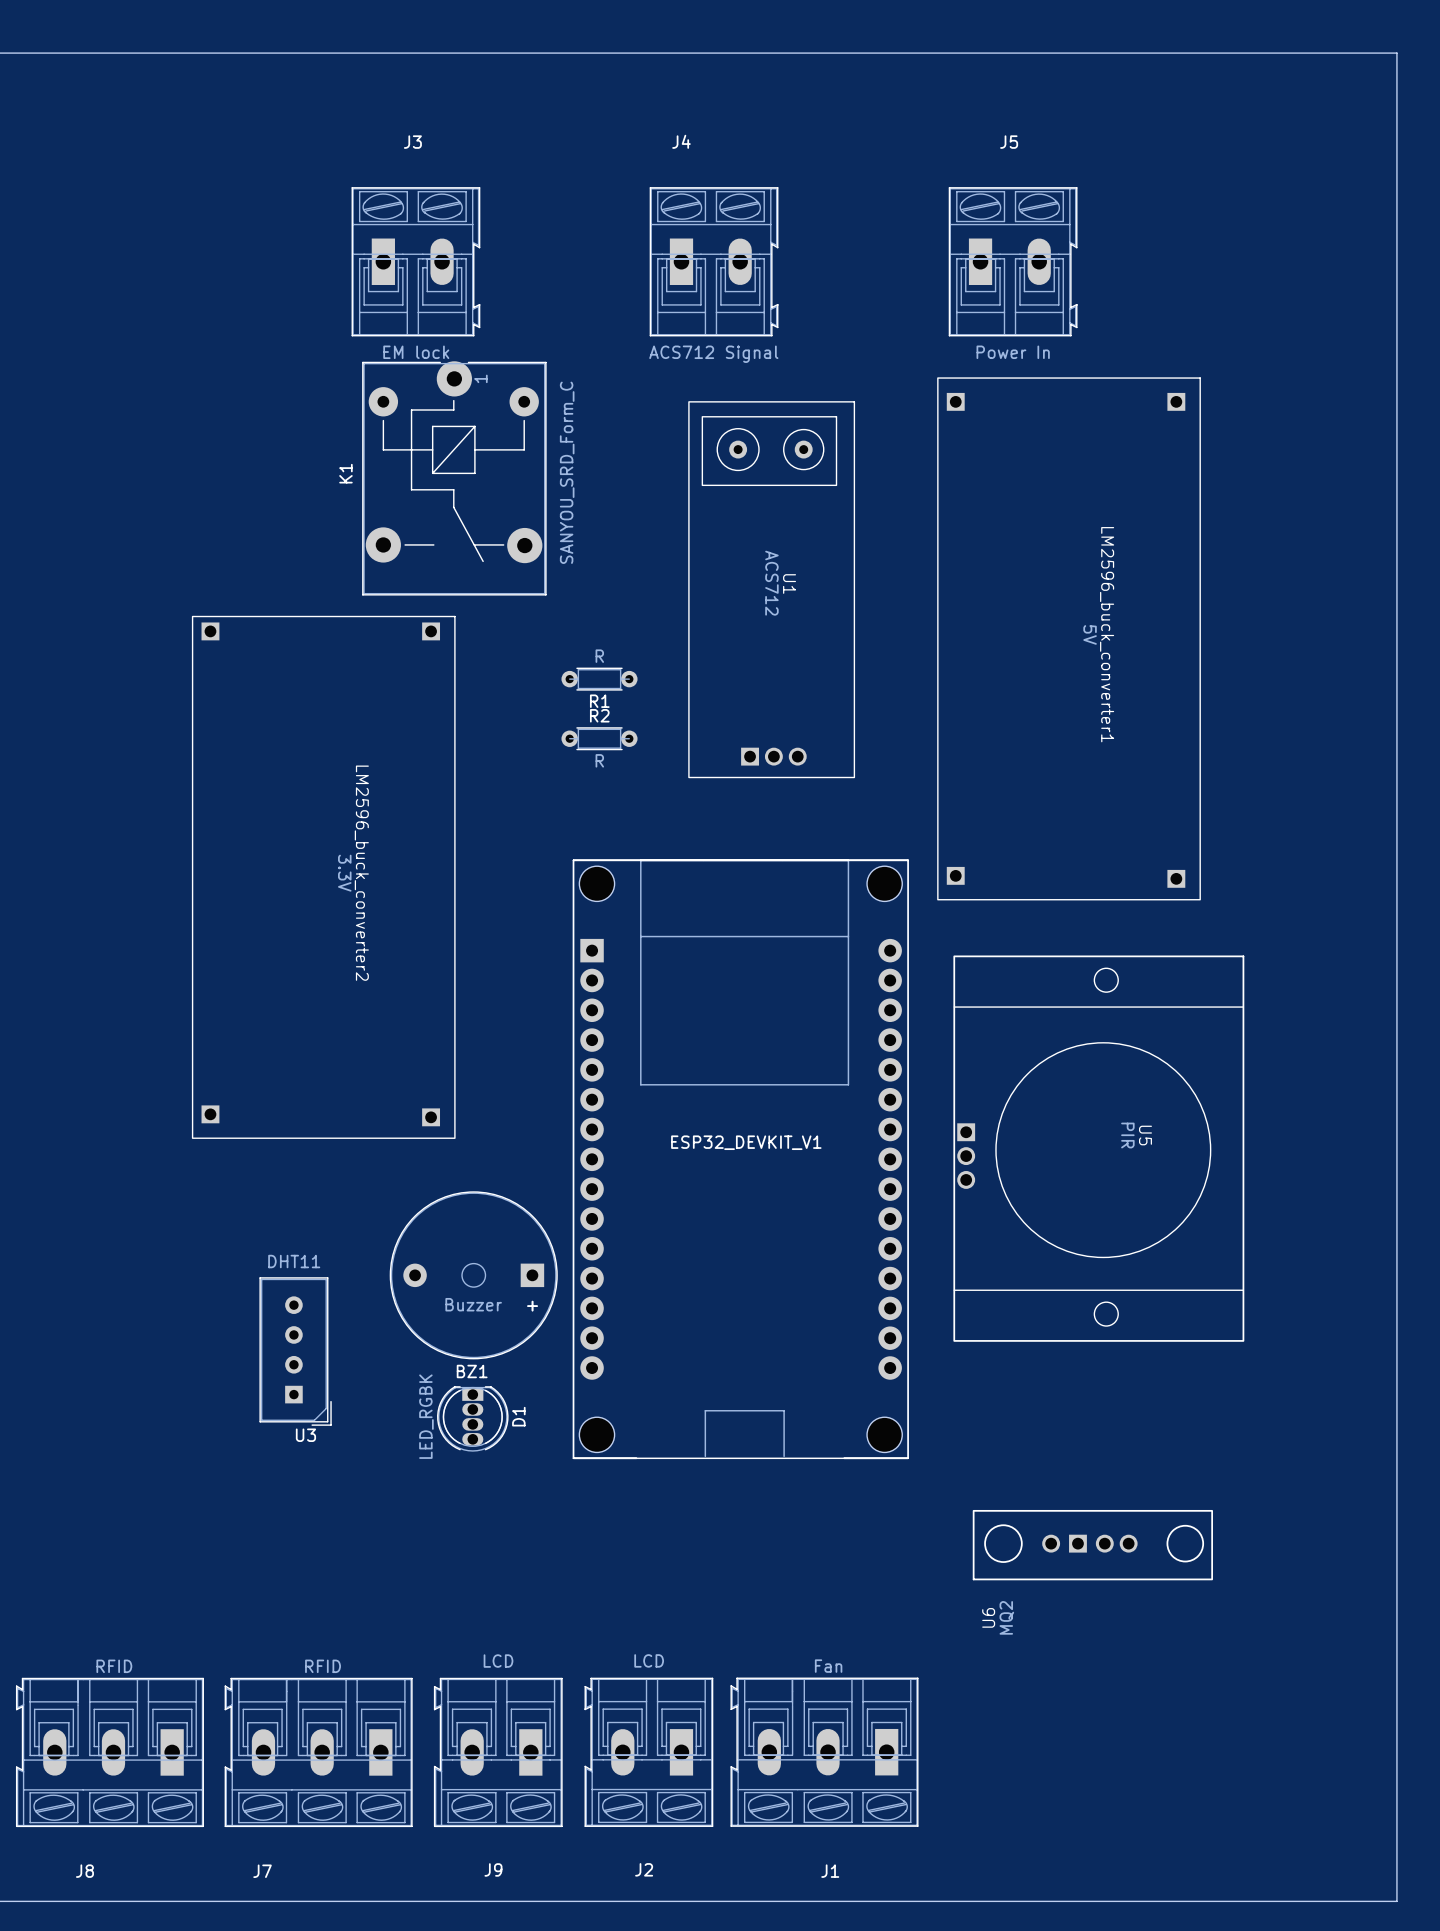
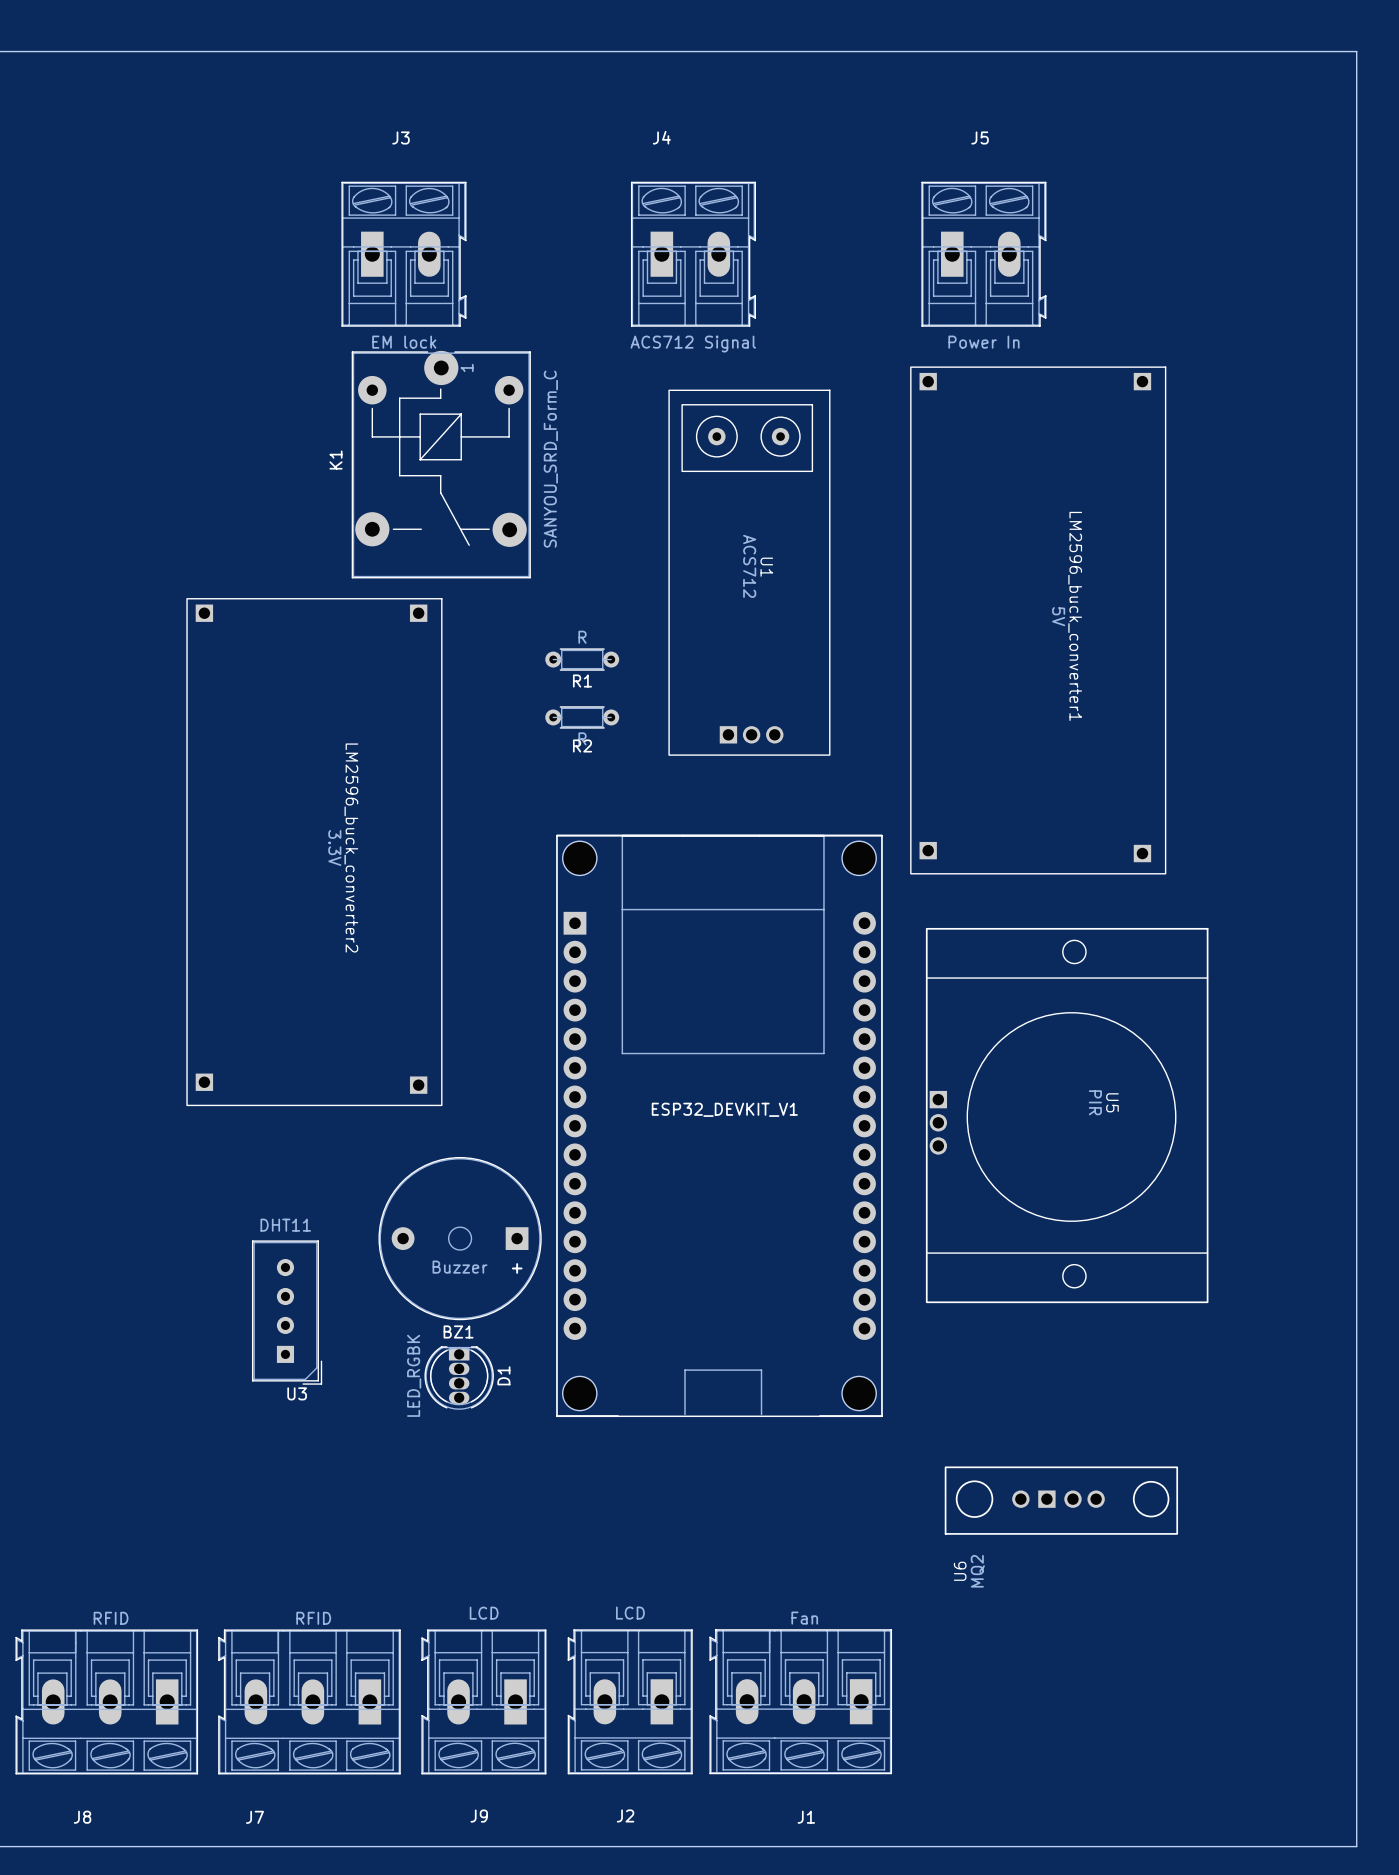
LM2596_buck_converter1 footprint: [937, 377, 1201, 901] -> [910, 366, 1167, 875]
R2 name position: R2 (599, 715) -> R2 (582, 745)

